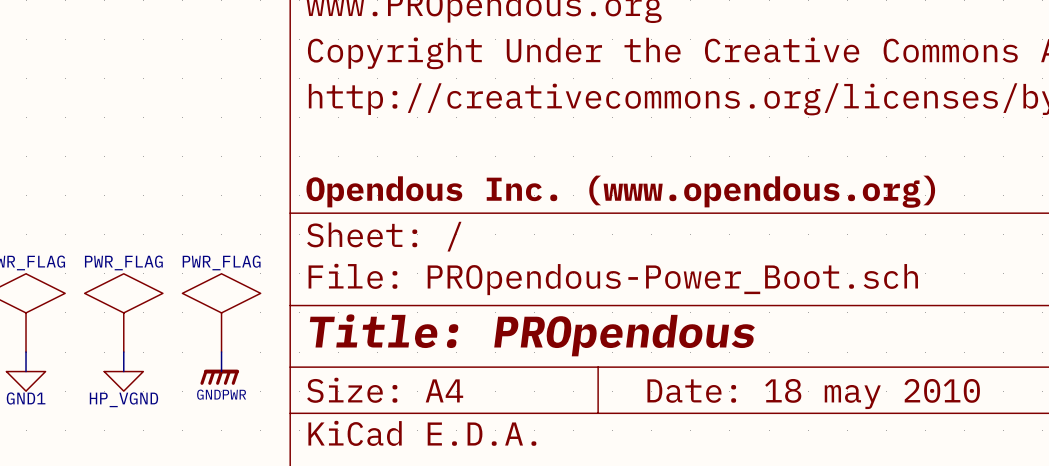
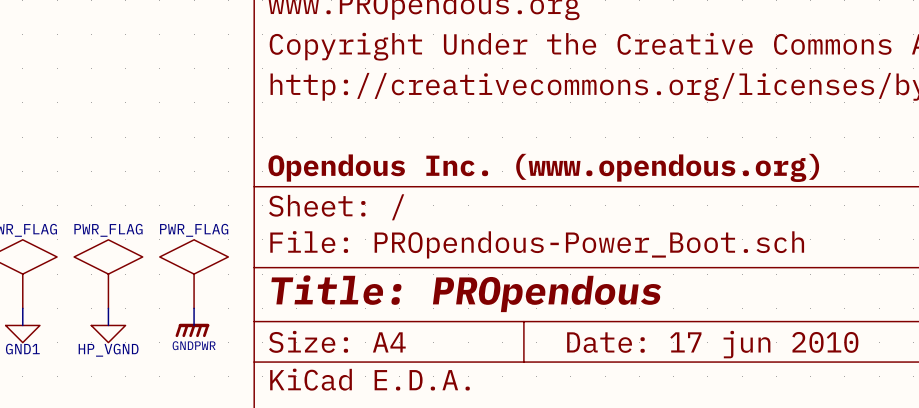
title block: Date: 18 may 2010 (813, 394) -> Date: 17 jun 2010 (712, 344)

